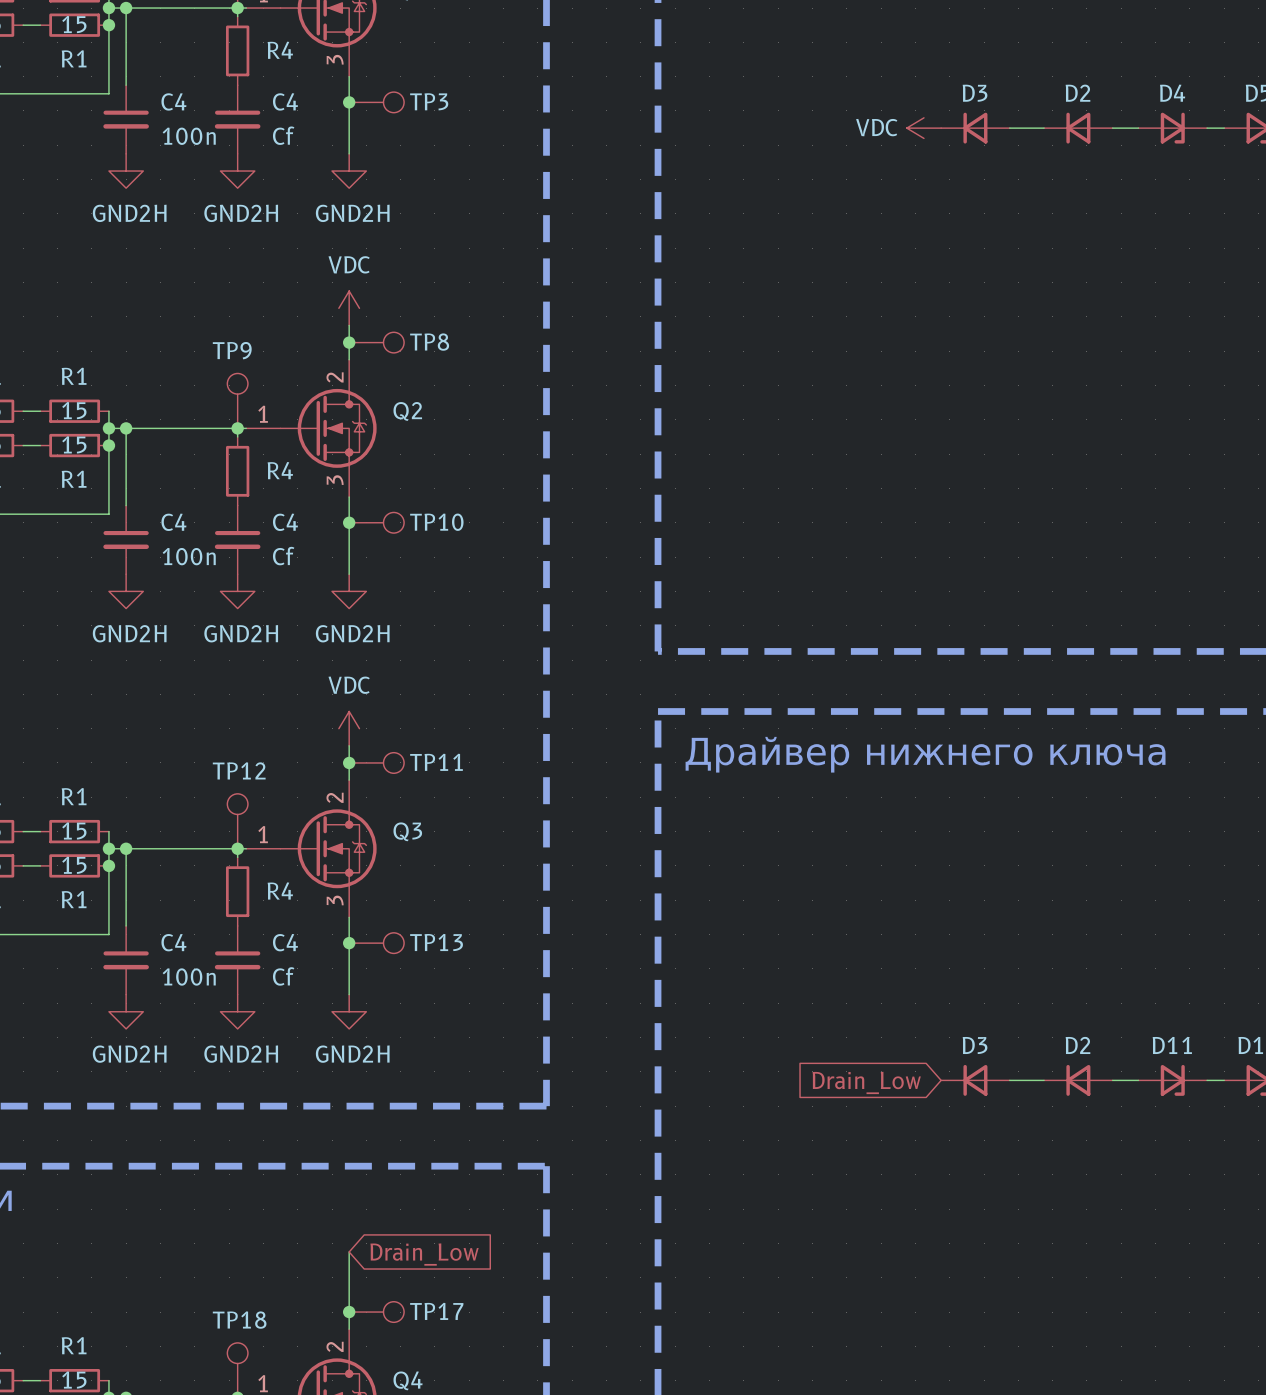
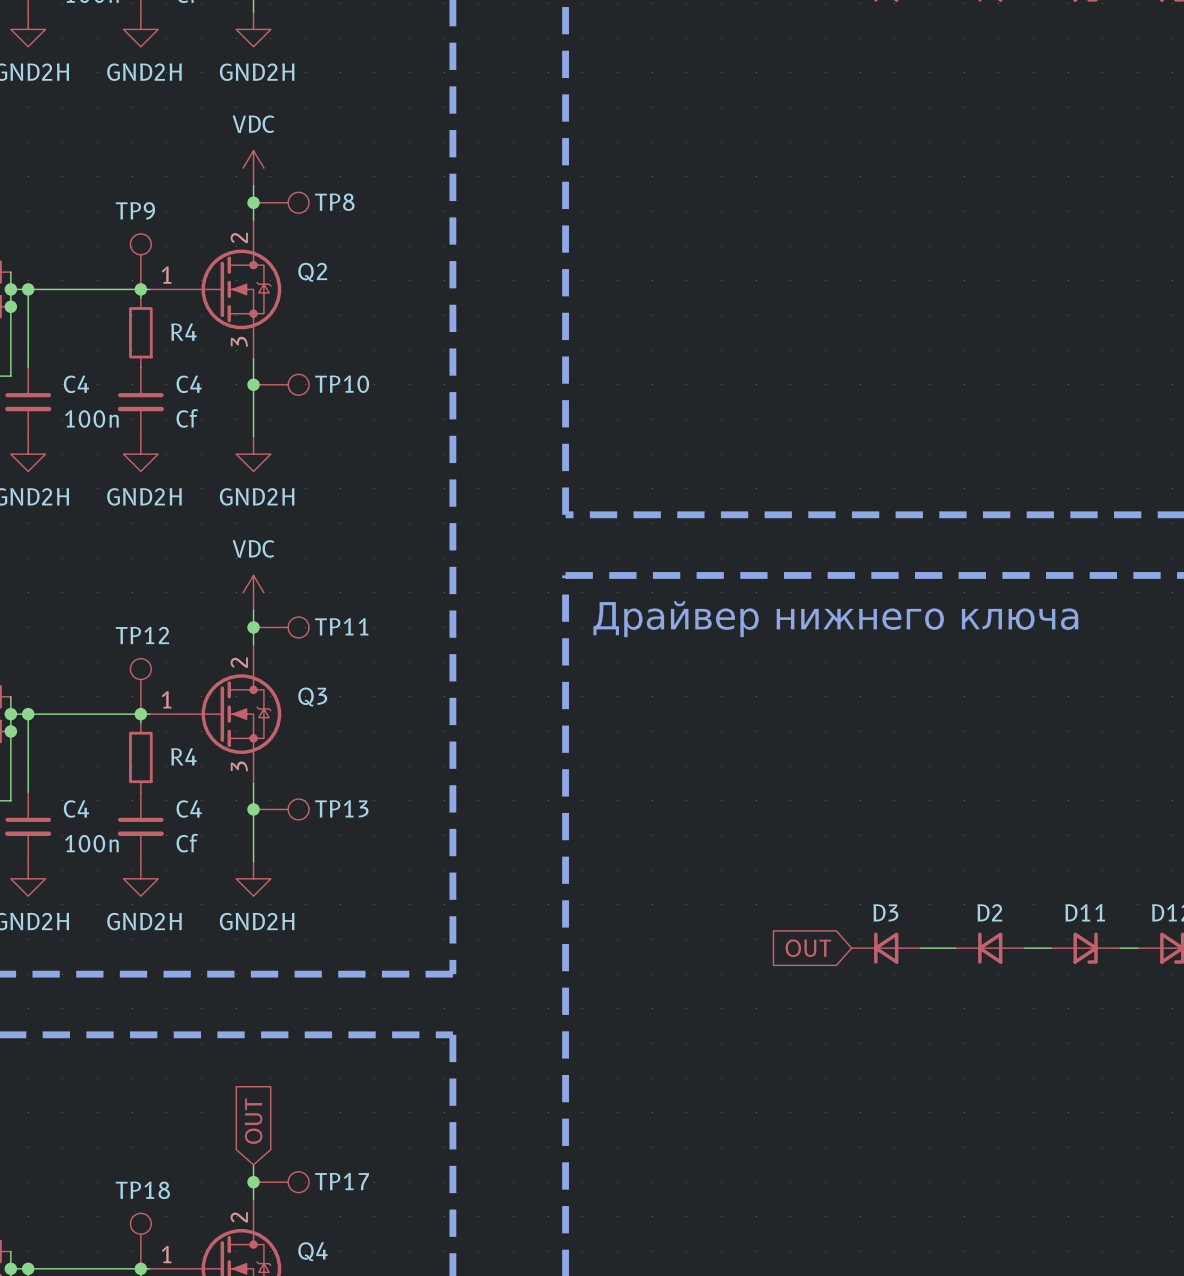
global label: Drain_Low (866, 1082) -> OUT (808, 948)
wire: (349, 1251) (349, 1294) -> none
global label: none -> OUT (253, 1121)
global label: Drain_Low (424, 1254) -> none

